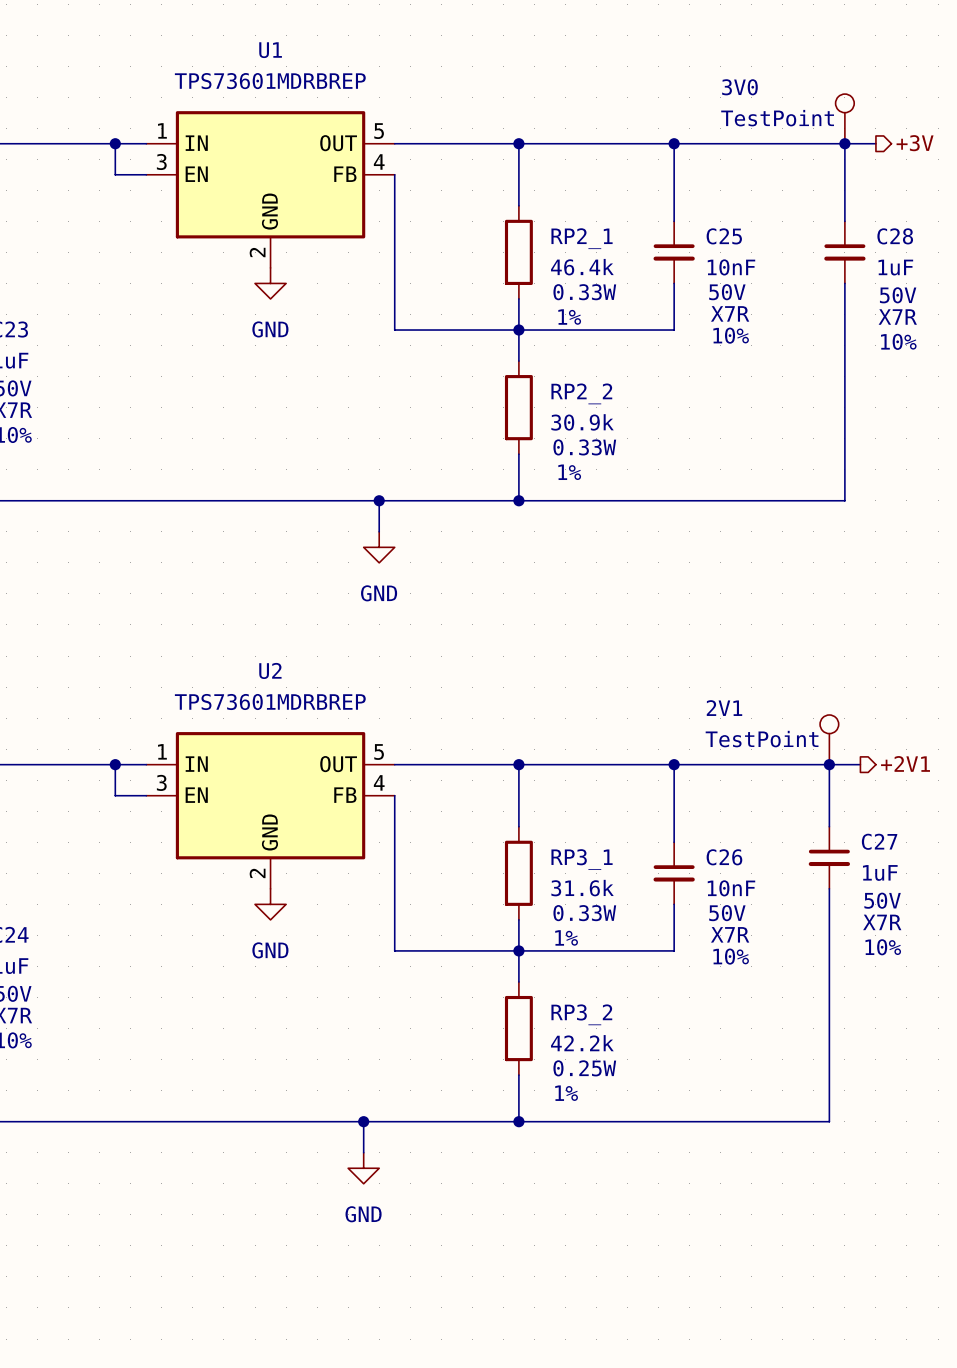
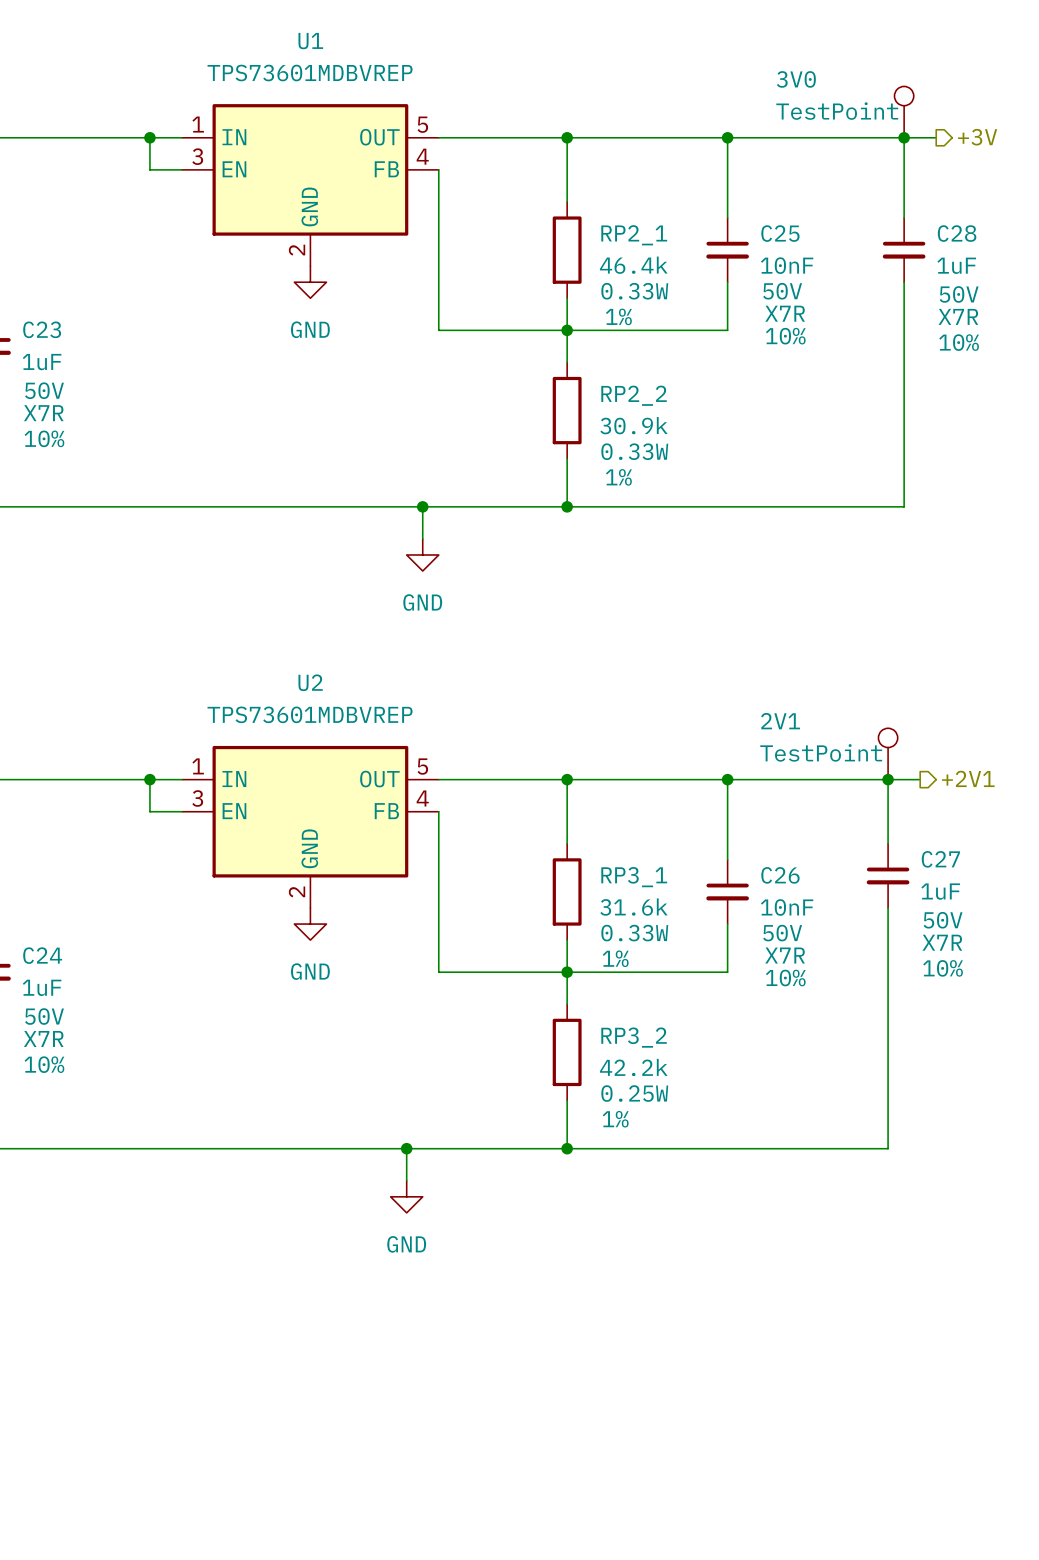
U1 value: TPS73601MDRBREP (270, 81) -> TPS73601MDBVREP (310, 73)
U2 value: TPS73601MDRBREP (270, 702) -> TPS73601MDBVREP (310, 714)

